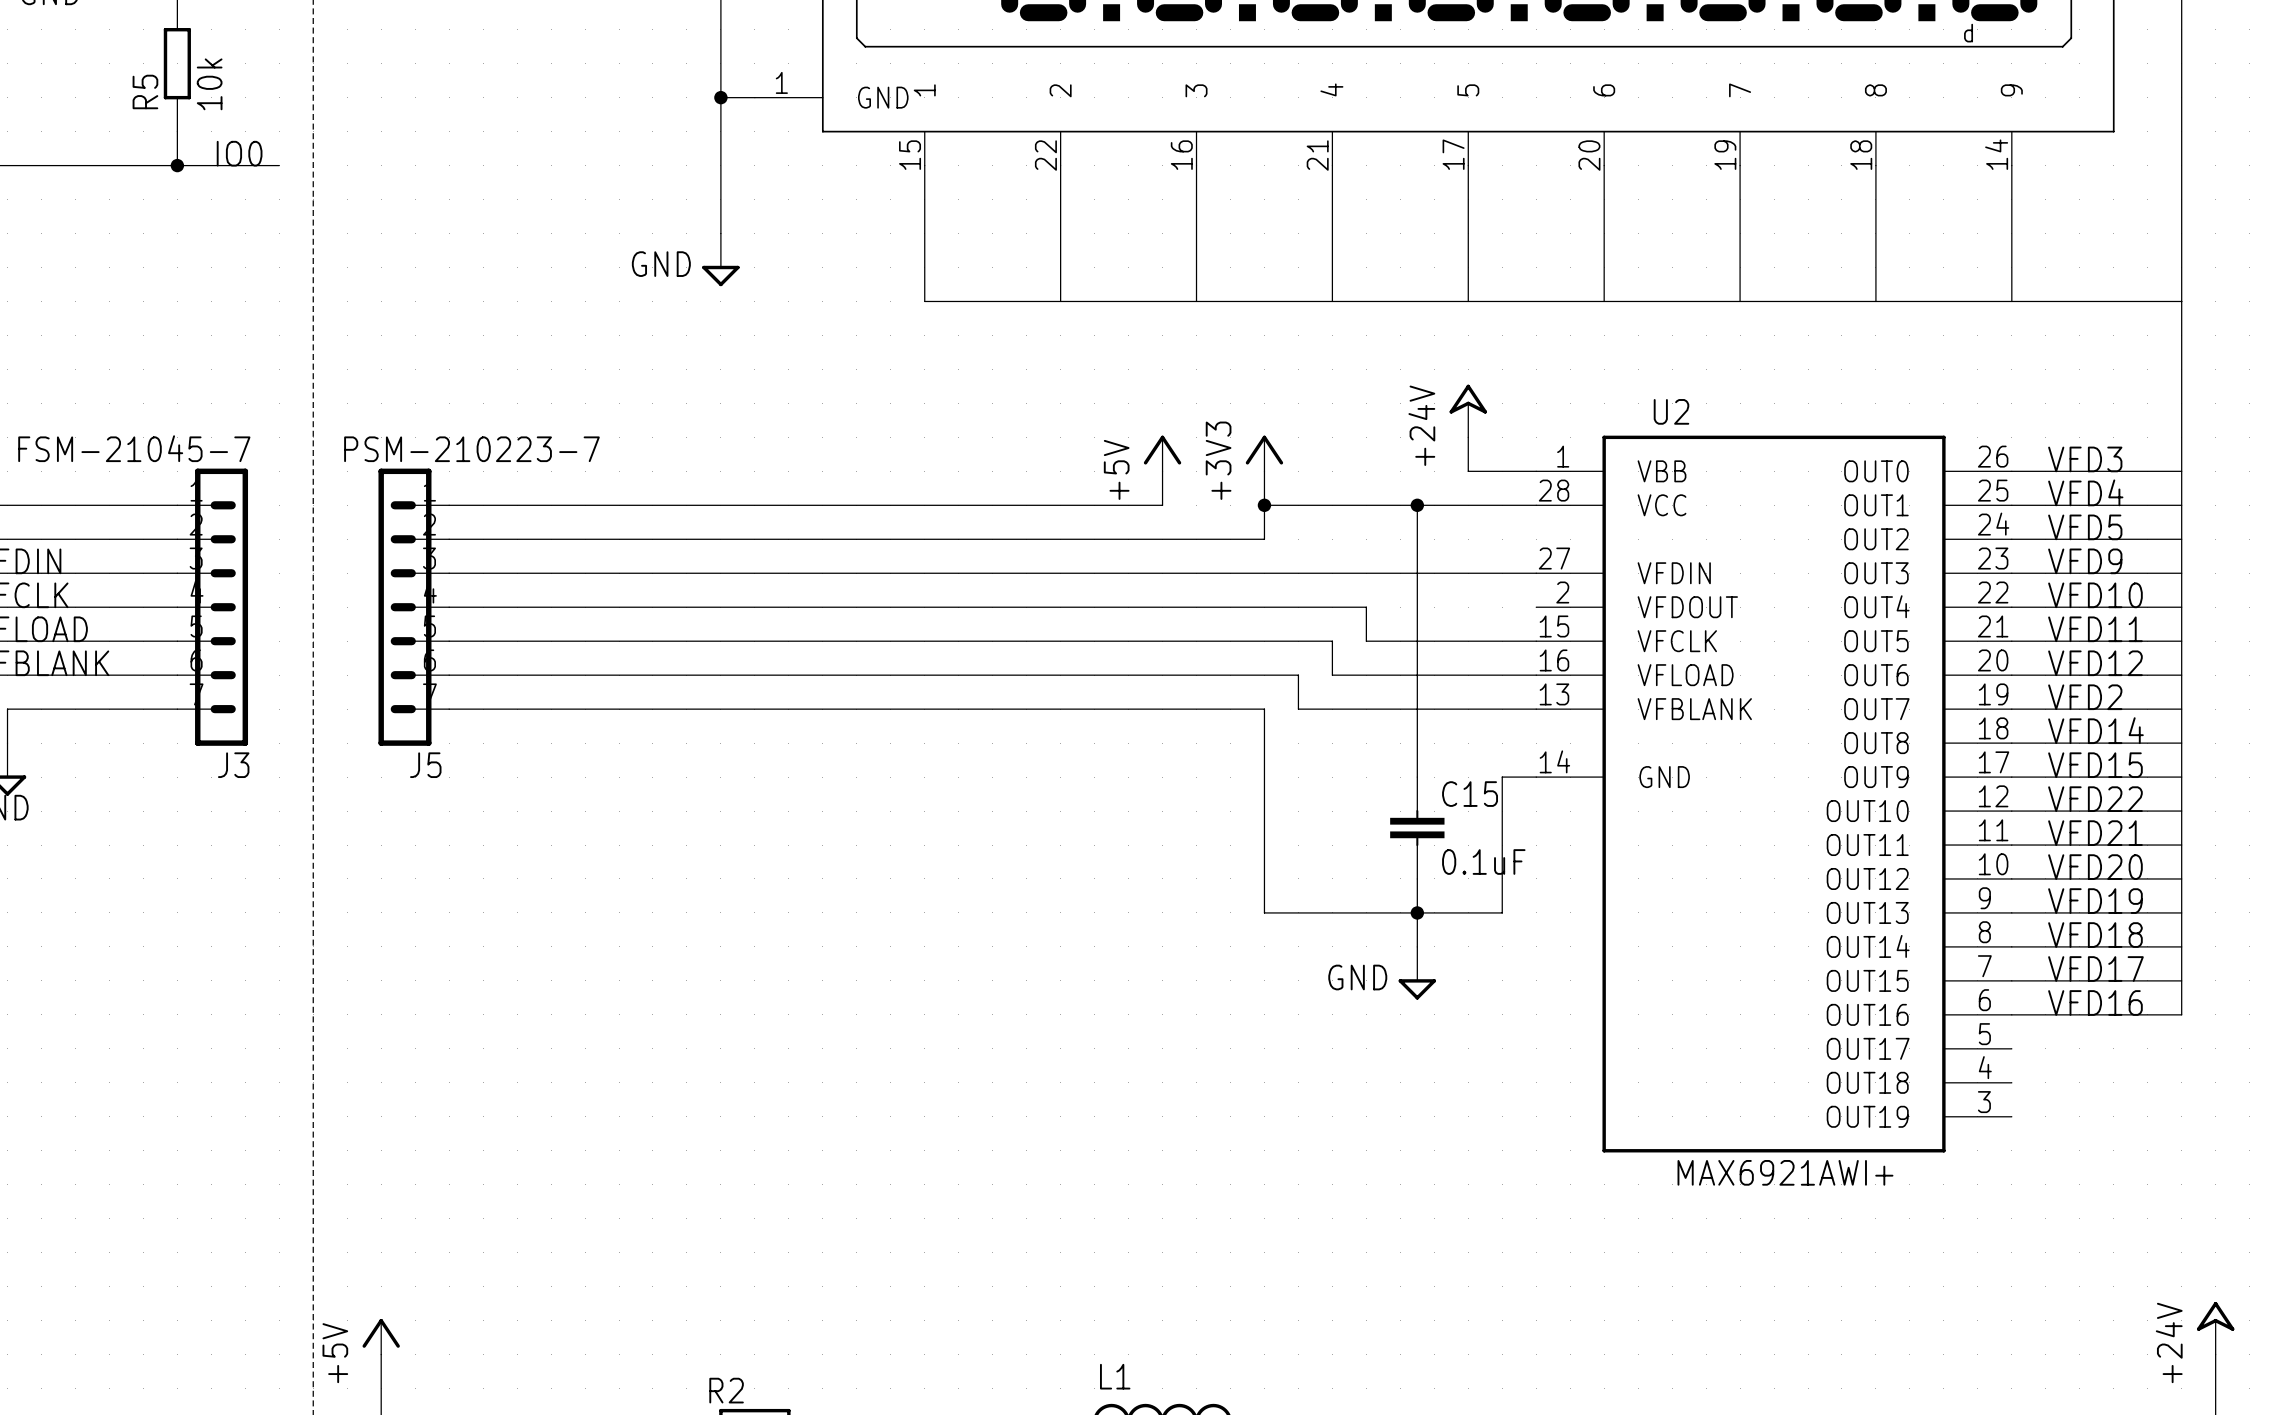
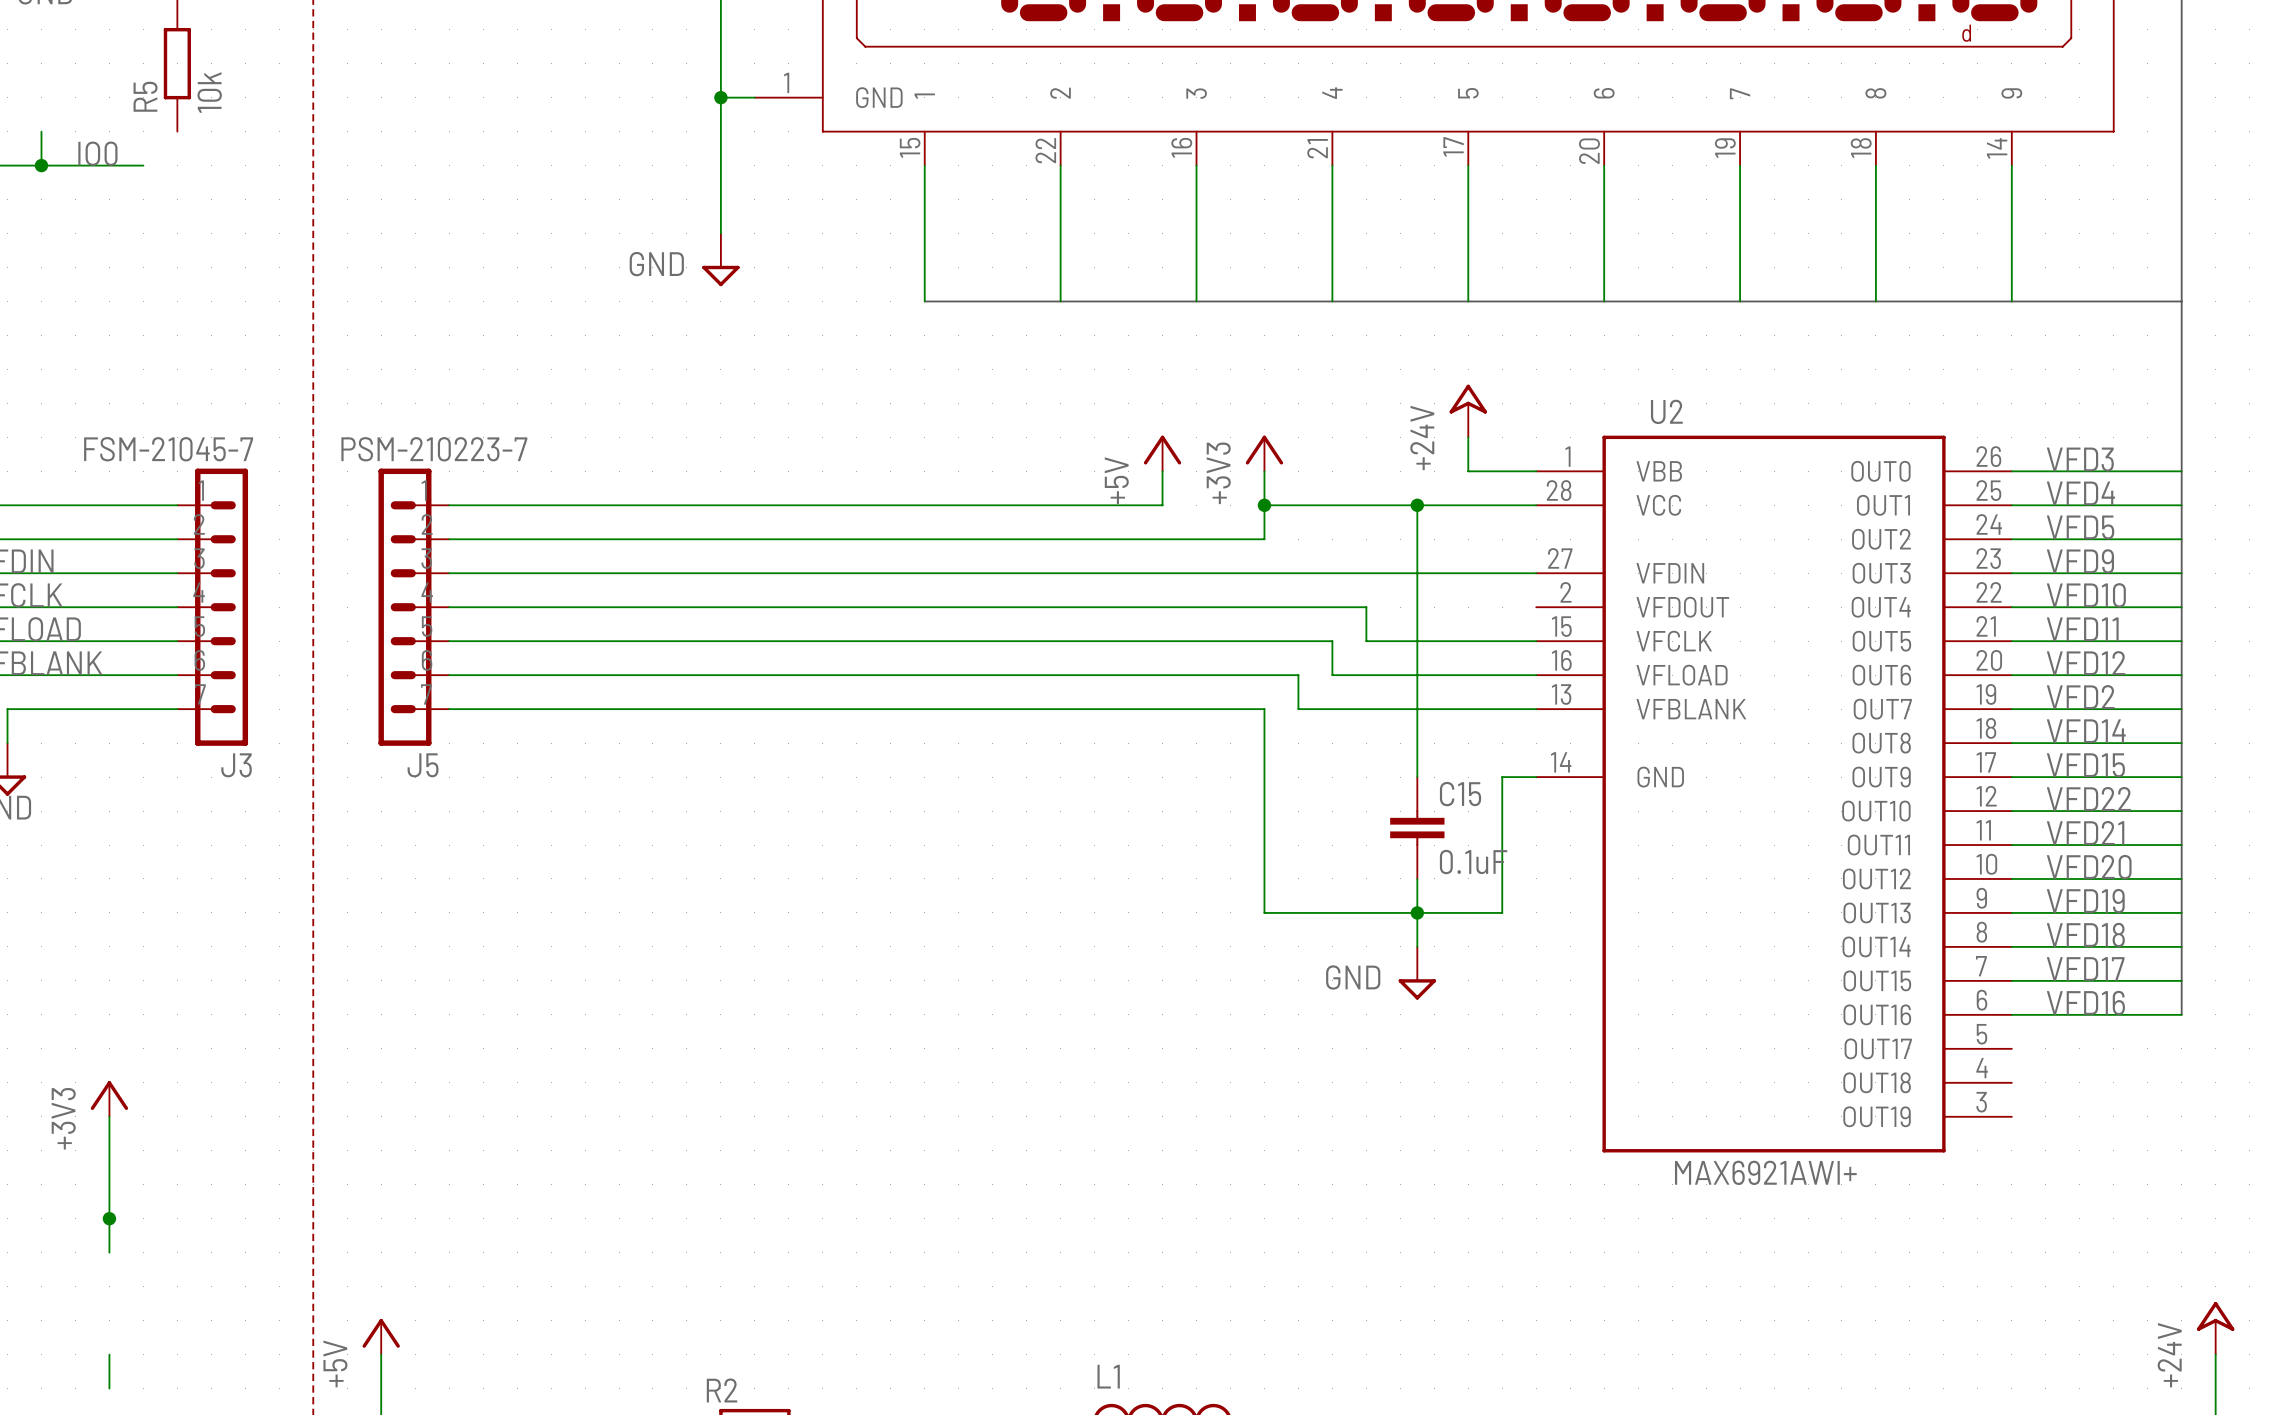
wire: (177, 131) (177, 165) -> (41, 131) (41, 165)
label position: IO0 (239, 153) -> IO0 (97, 153)
junction: none -> (41, 165)
wire: (143, 165) (279, 165) -> none
junction: (177, 165) -> none
power symbol: none -> +3V3 (109, 1098)
wire: none -> (109, 1116) (109, 1252)
junction: none -> (109, 1218)
wire: none -> (109, 1354) (109, 1388)

